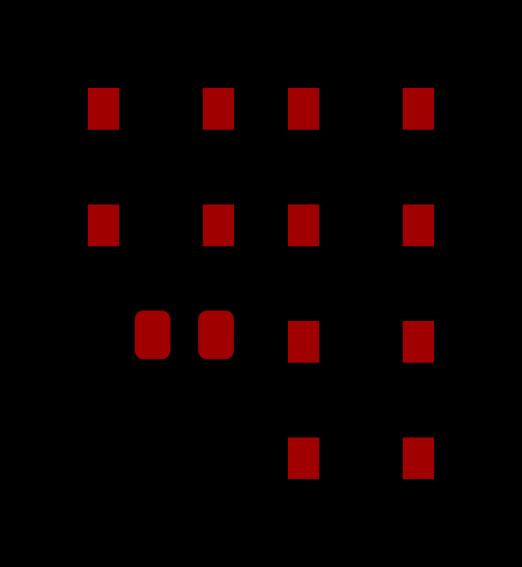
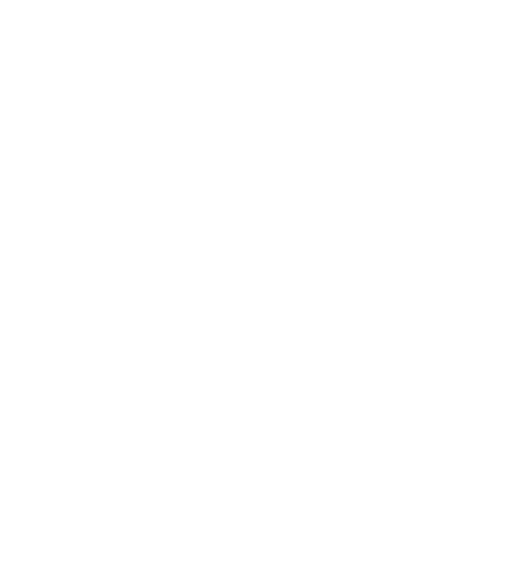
part: (161, 108) -> none
part: (360, 108) -> none
part: (161, 225) -> none
part: (360, 225) -> none
part: (184, 334) -> none
part: (360, 341) -> none
part: (360, 458) -> none

